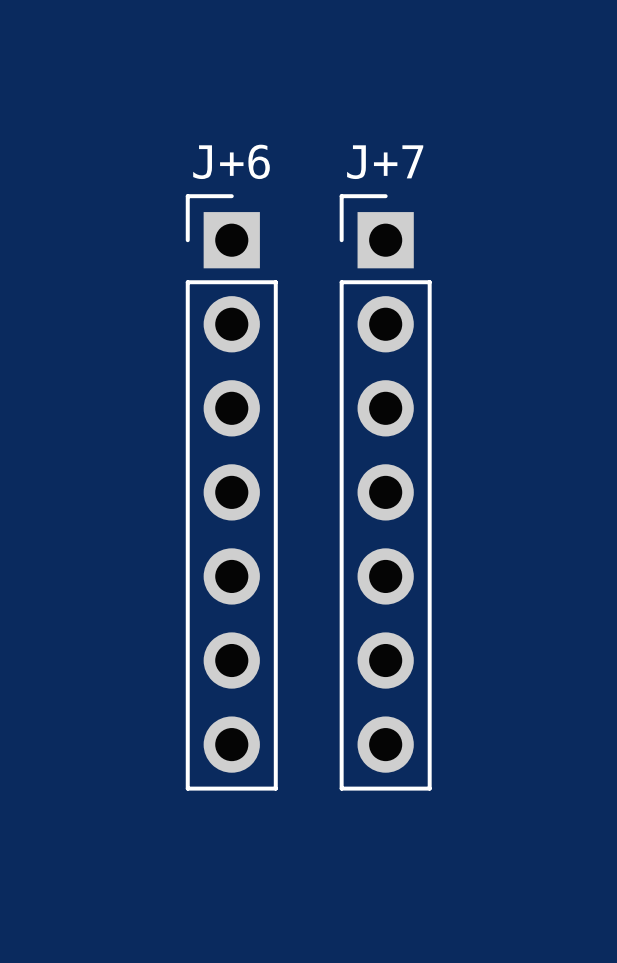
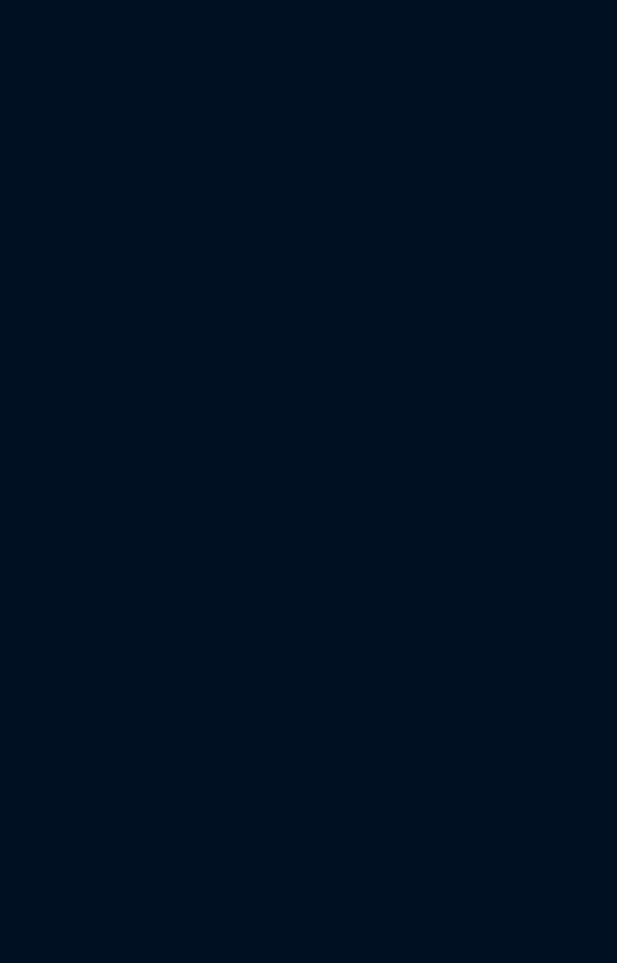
J+6: (231, 492) -> none
J+7: (385, 492) -> none

